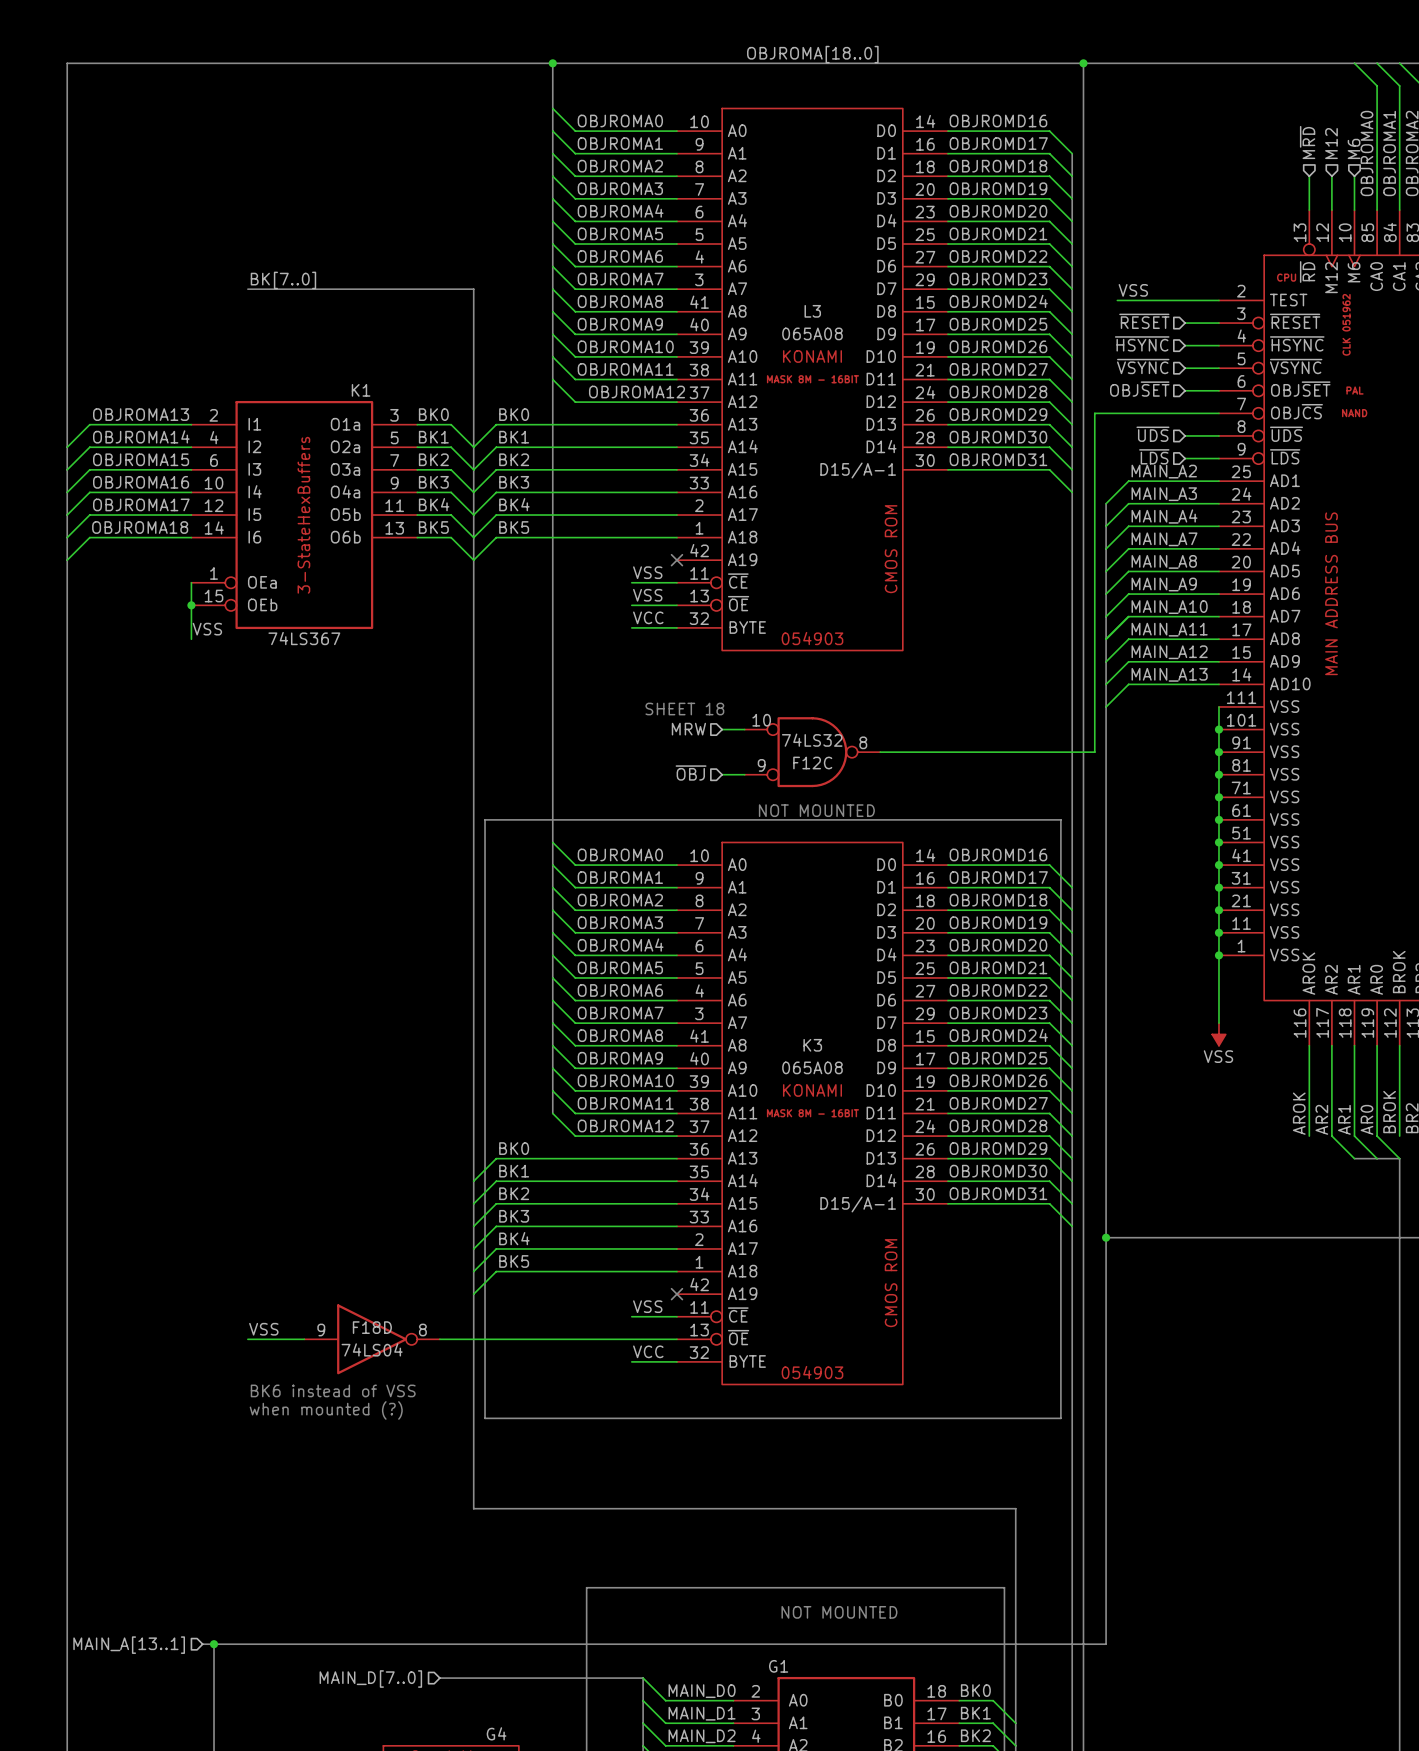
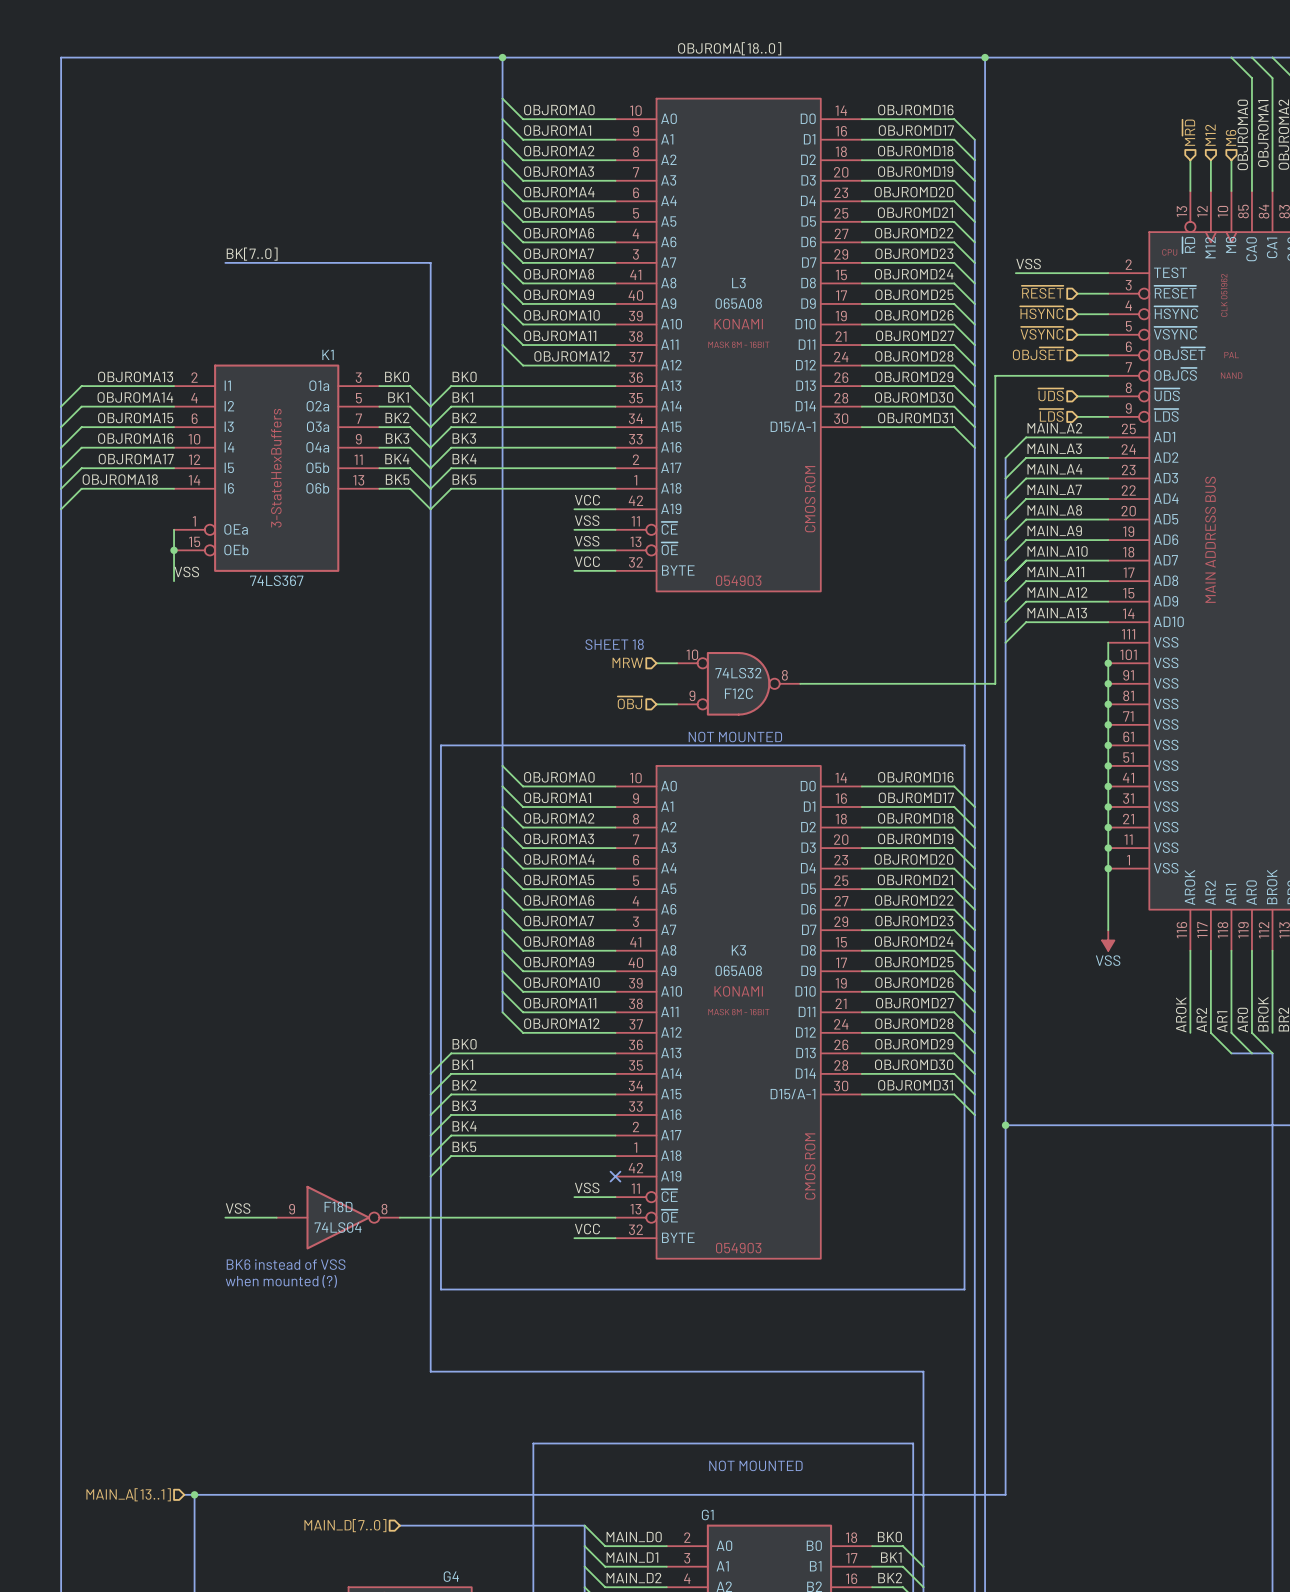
label: none -> VCC (587, 500)
wire: none -> (574, 509) (615, 509)
no-connect mark: (676, 560) -> none

